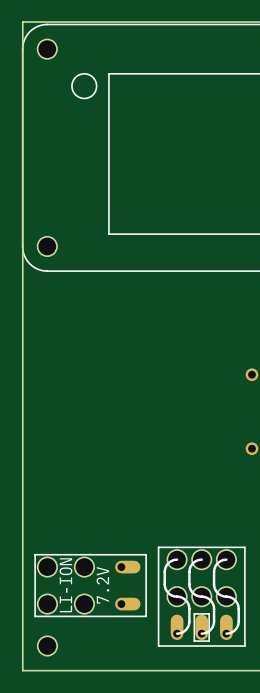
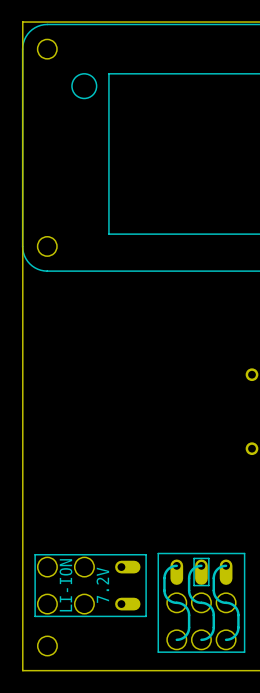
part rotation: 0° (201, 596) -> 180° (201, 602)

